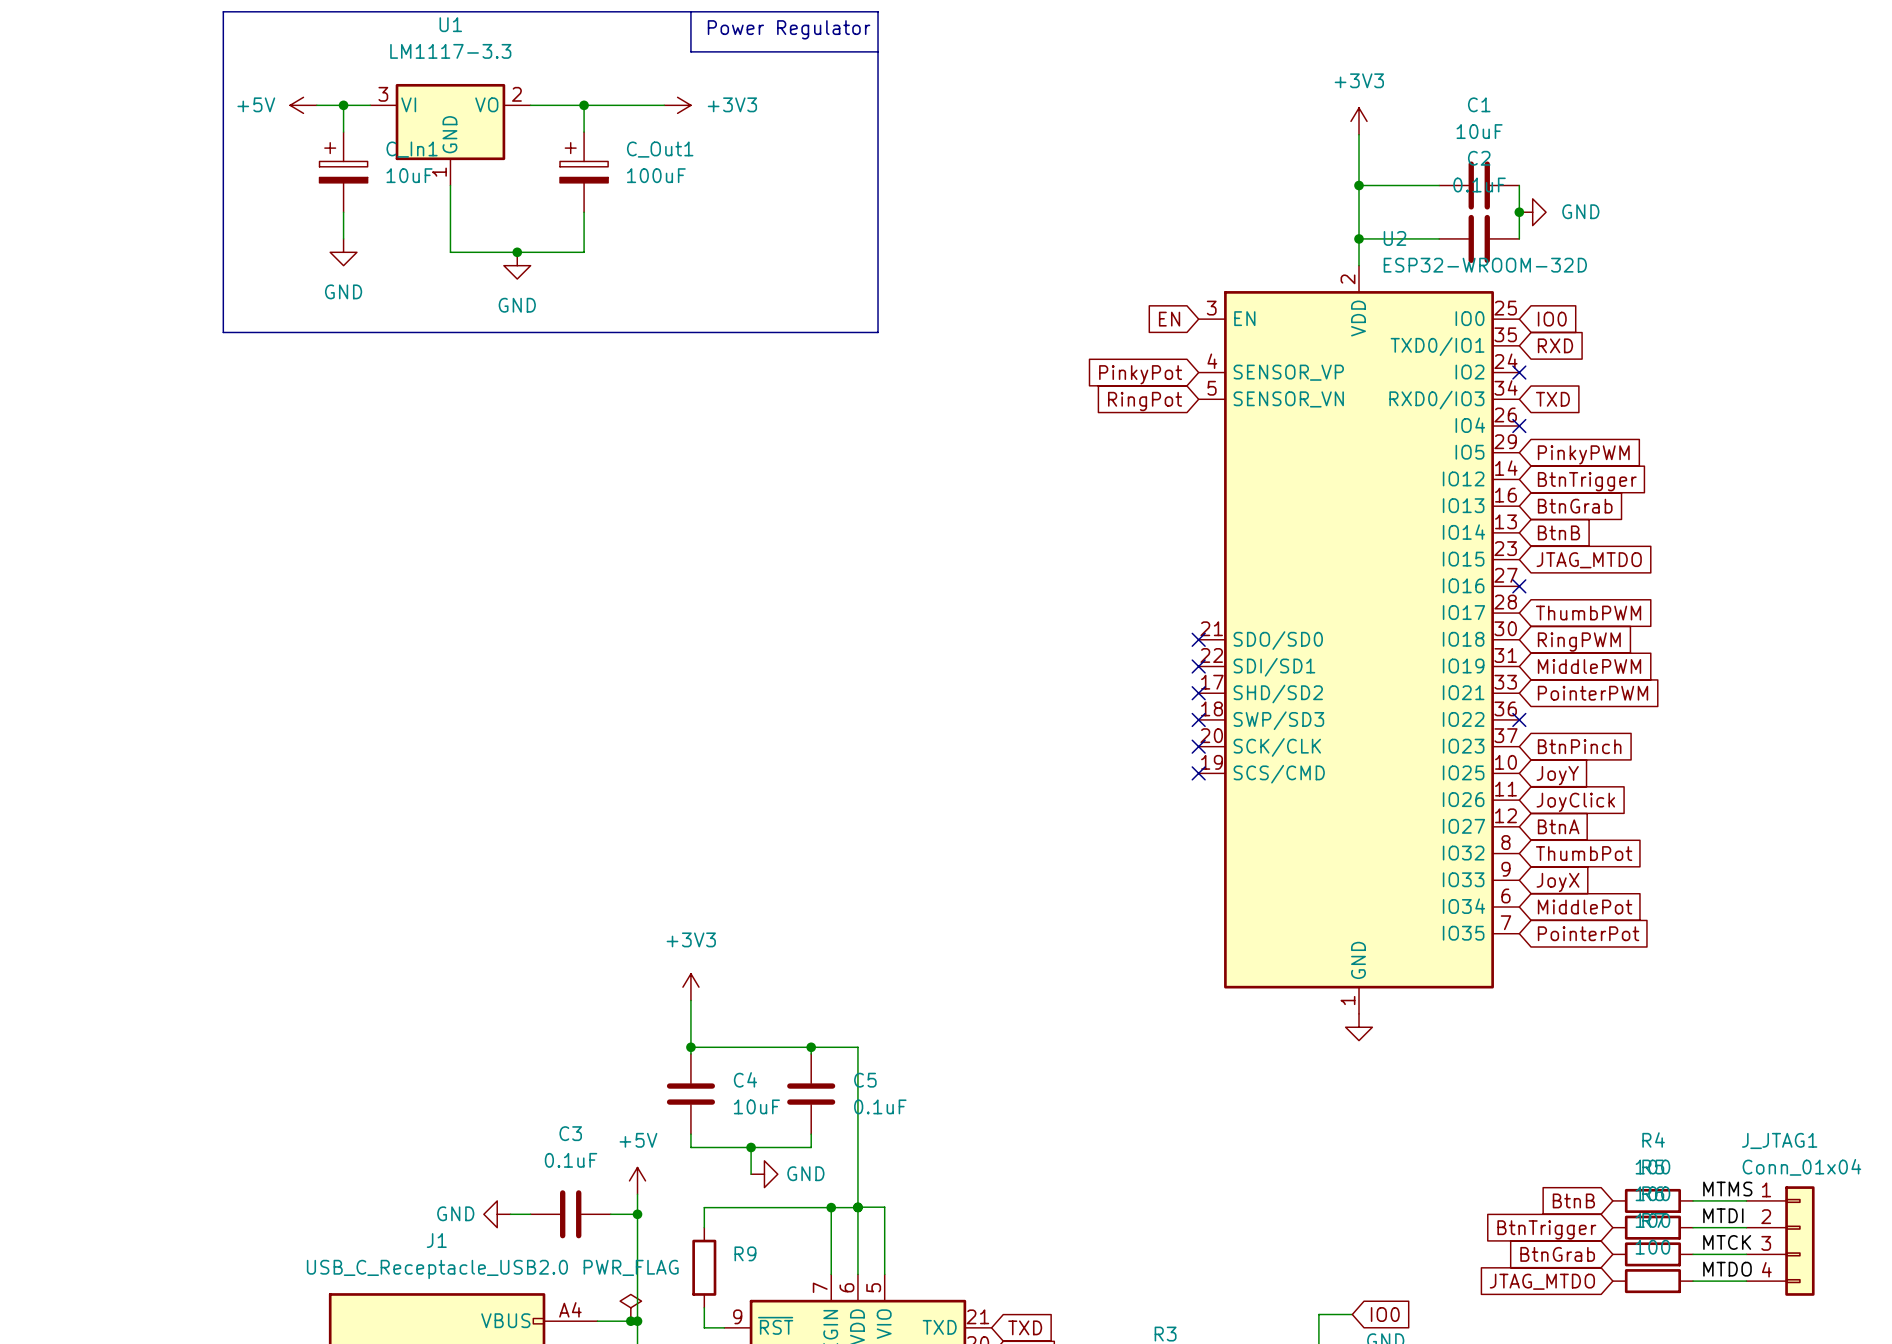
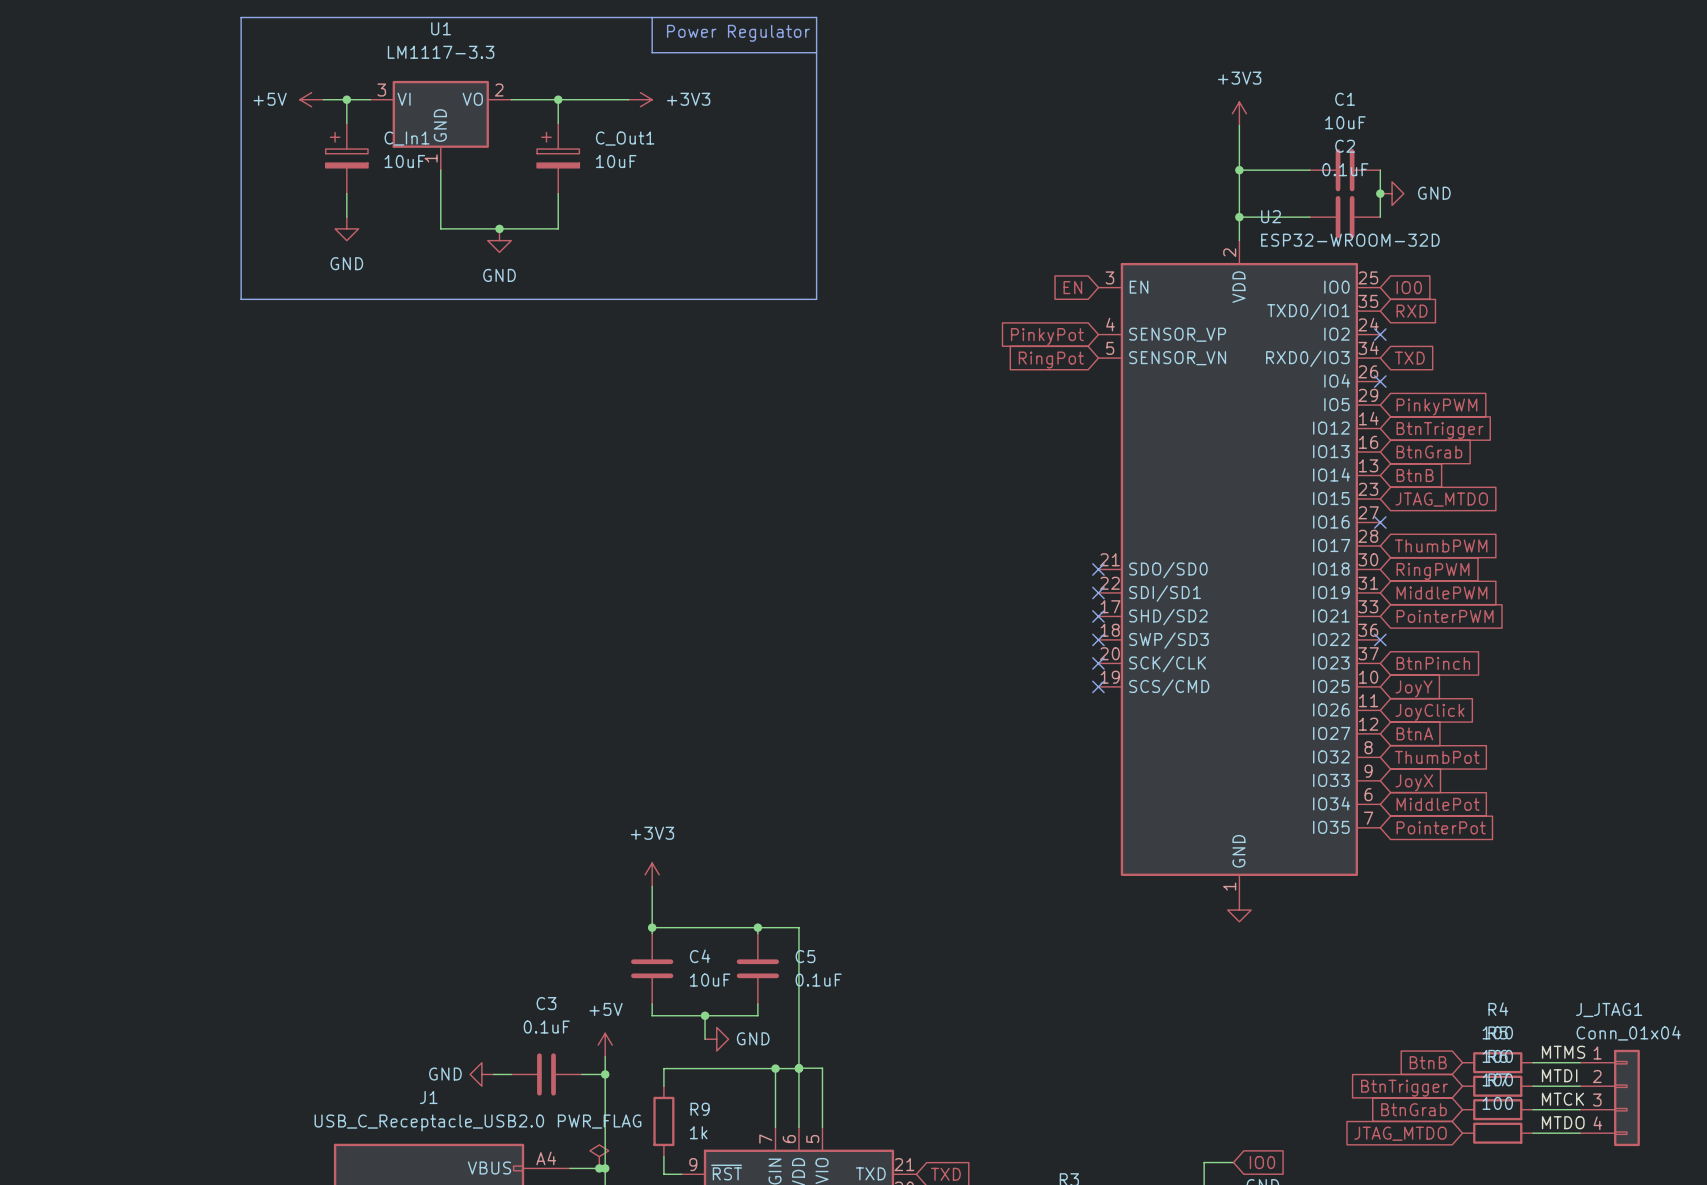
C_Out1 value: 100uF (656, 175) -> 10uF (616, 161)
R9 value: none -> 1k (698, 1132)

